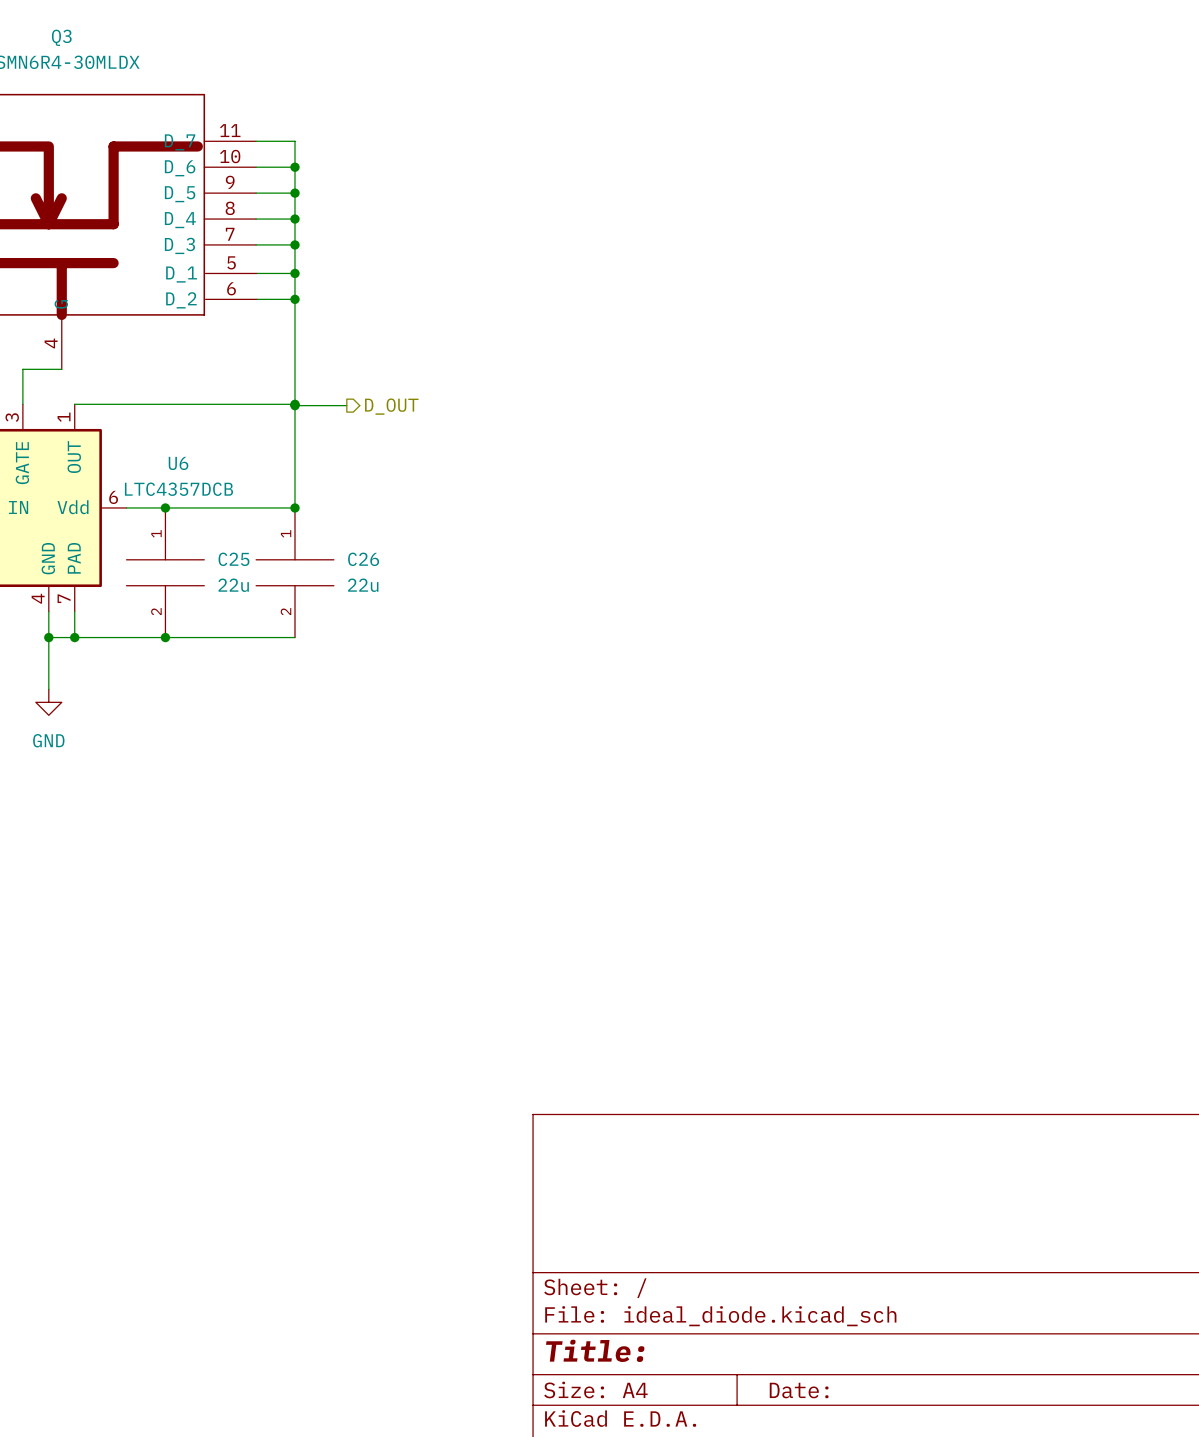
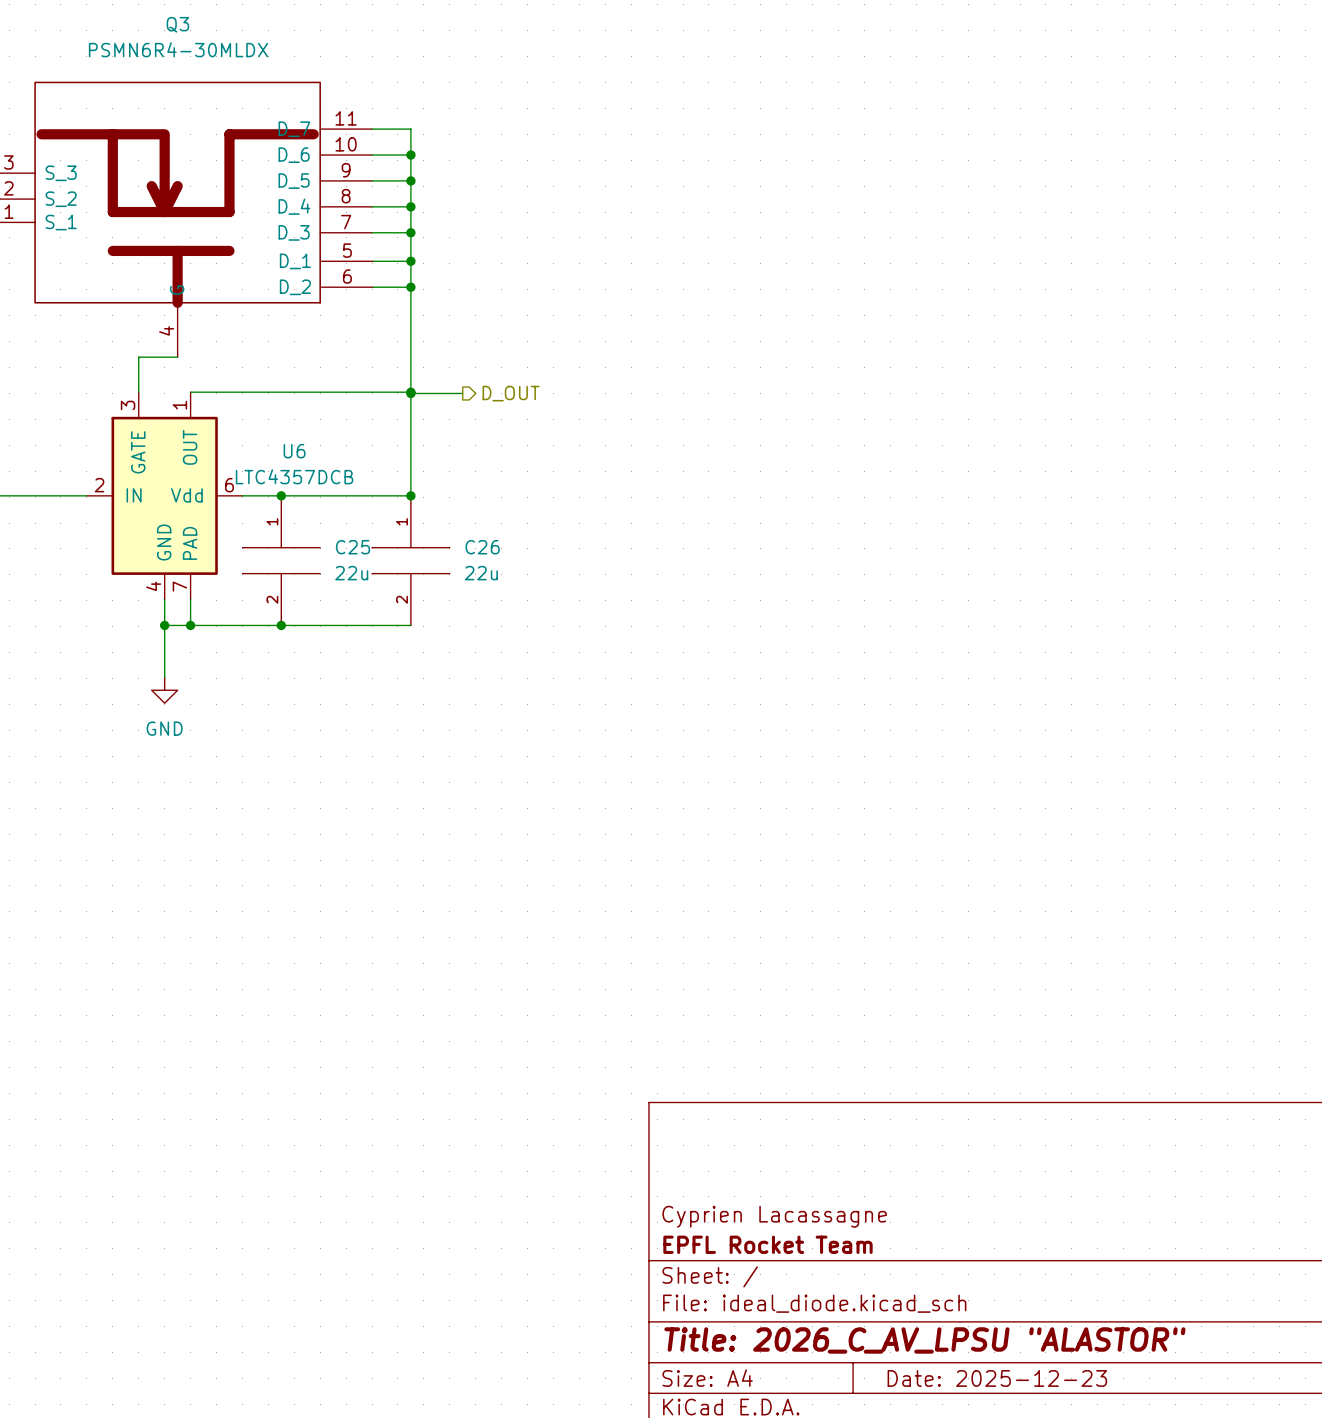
title block: none -> Cyprien Lacassagne (774, 1216)
title block: none -> EPFL Rocket Team (767, 1244)
title block: Title: (595, 1350) -> Title: 2026_C_AV_LPSU "ALASTOR" (924, 1340)
title block: Date: (799, 1390) -> Date: 2025-12-23 (997, 1378)

